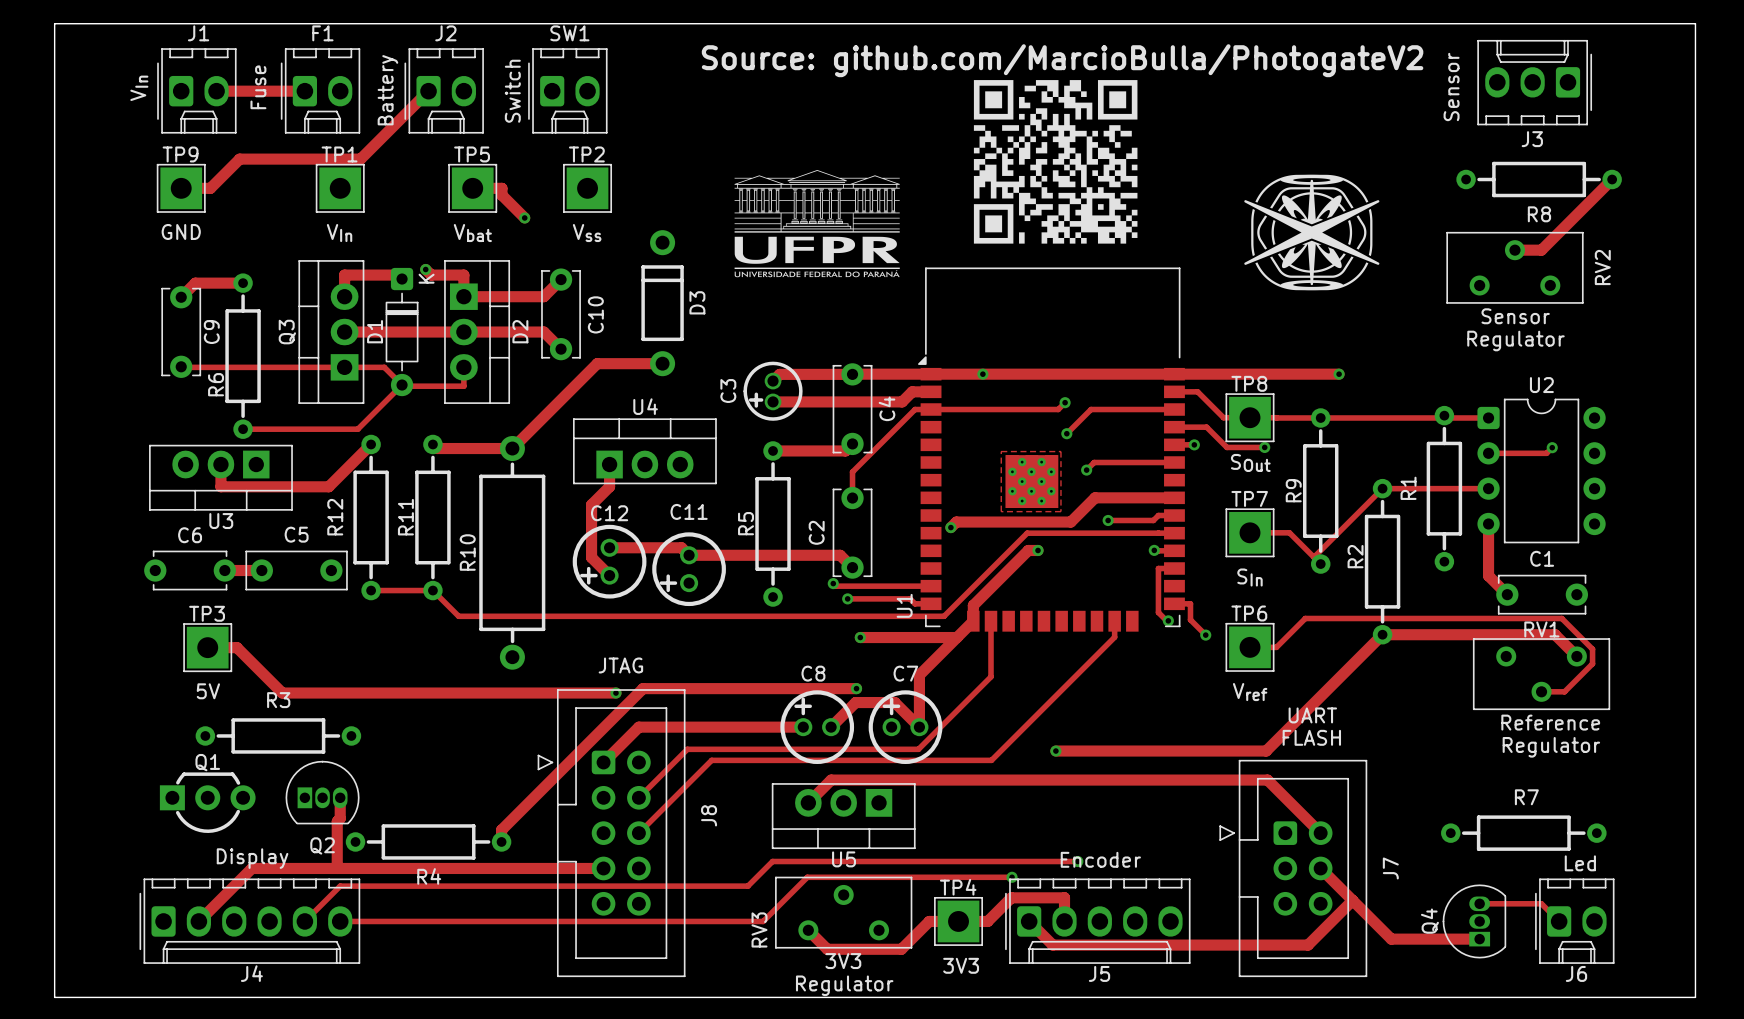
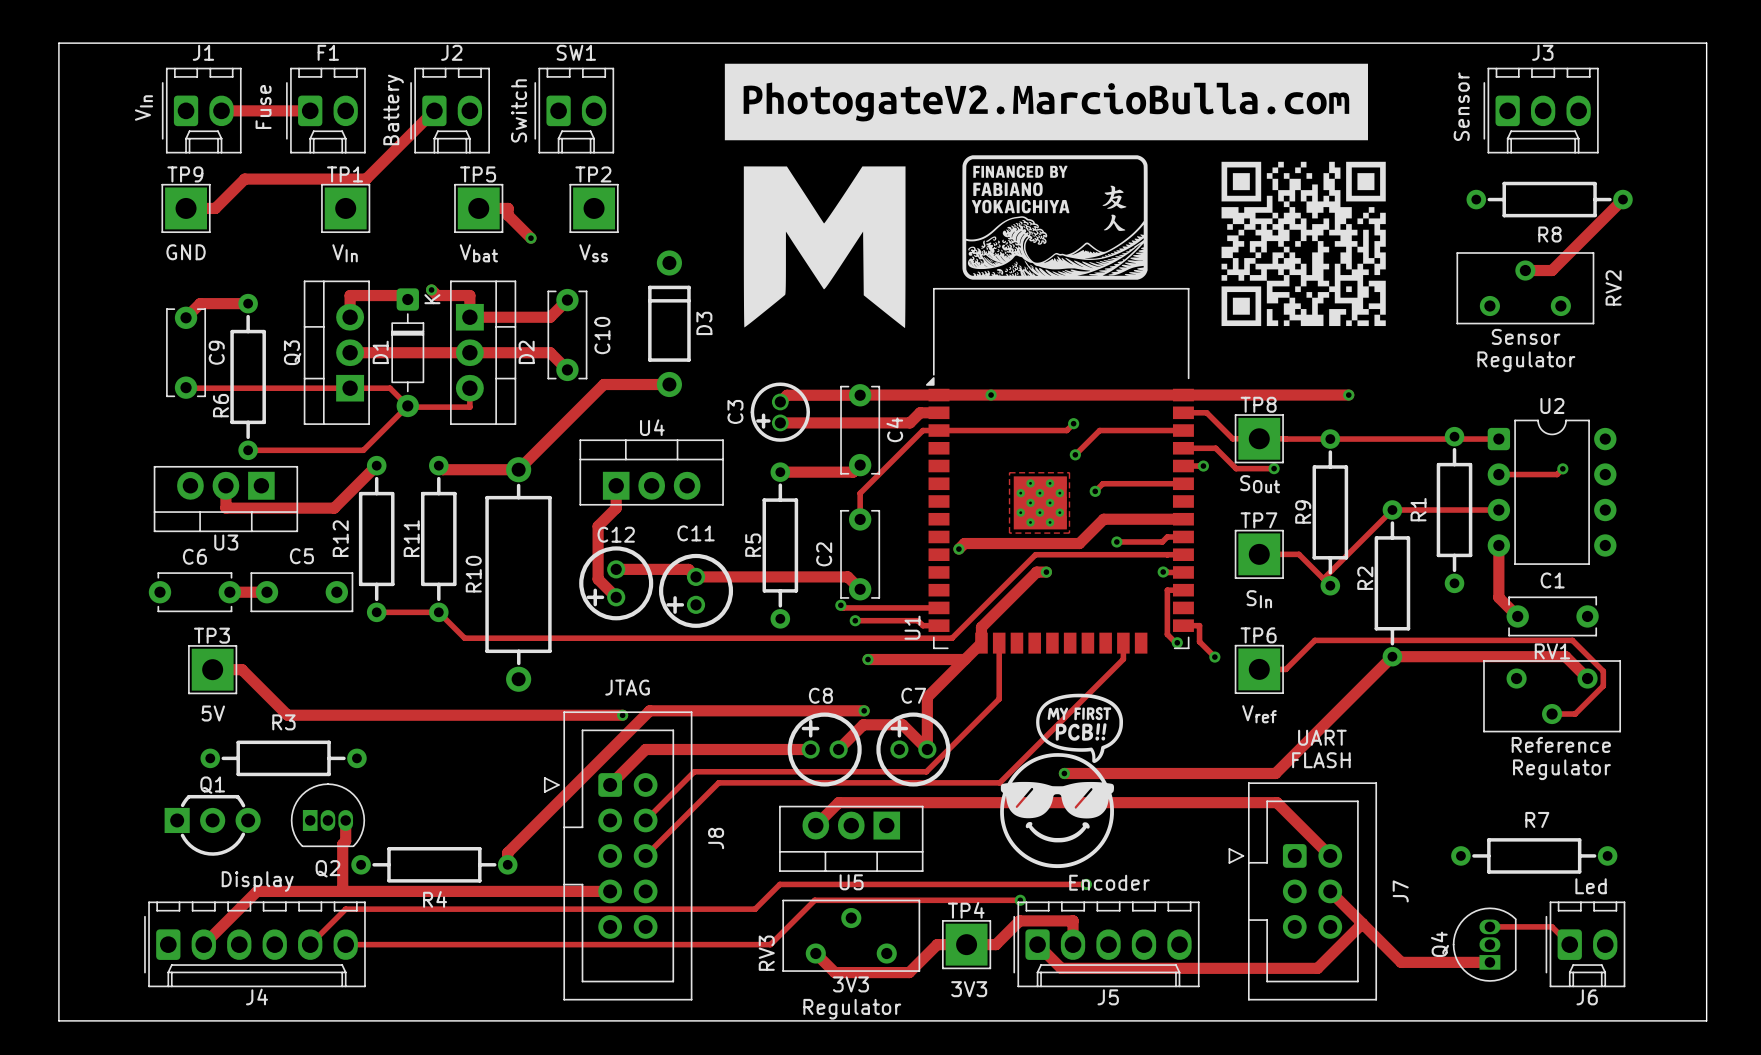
drawing: none -> [724, 63, 1369, 280]
text: Source: github.com/MarcioBulla/PhotogateV2 (1062, 60) -> none
drawing: [973, 80, 1138, 244] -> none
J3 rotation: 0° (1534, 82) -> 180° (1541, 110)
drawing: none -> [1221, 161, 1386, 327]
drawing shape: [734, 169, 900, 278] -> [743, 166, 906, 329]
drawing: [1244, 174, 1380, 291] -> none
drawing: none -> [1000, 693, 1124, 869]

